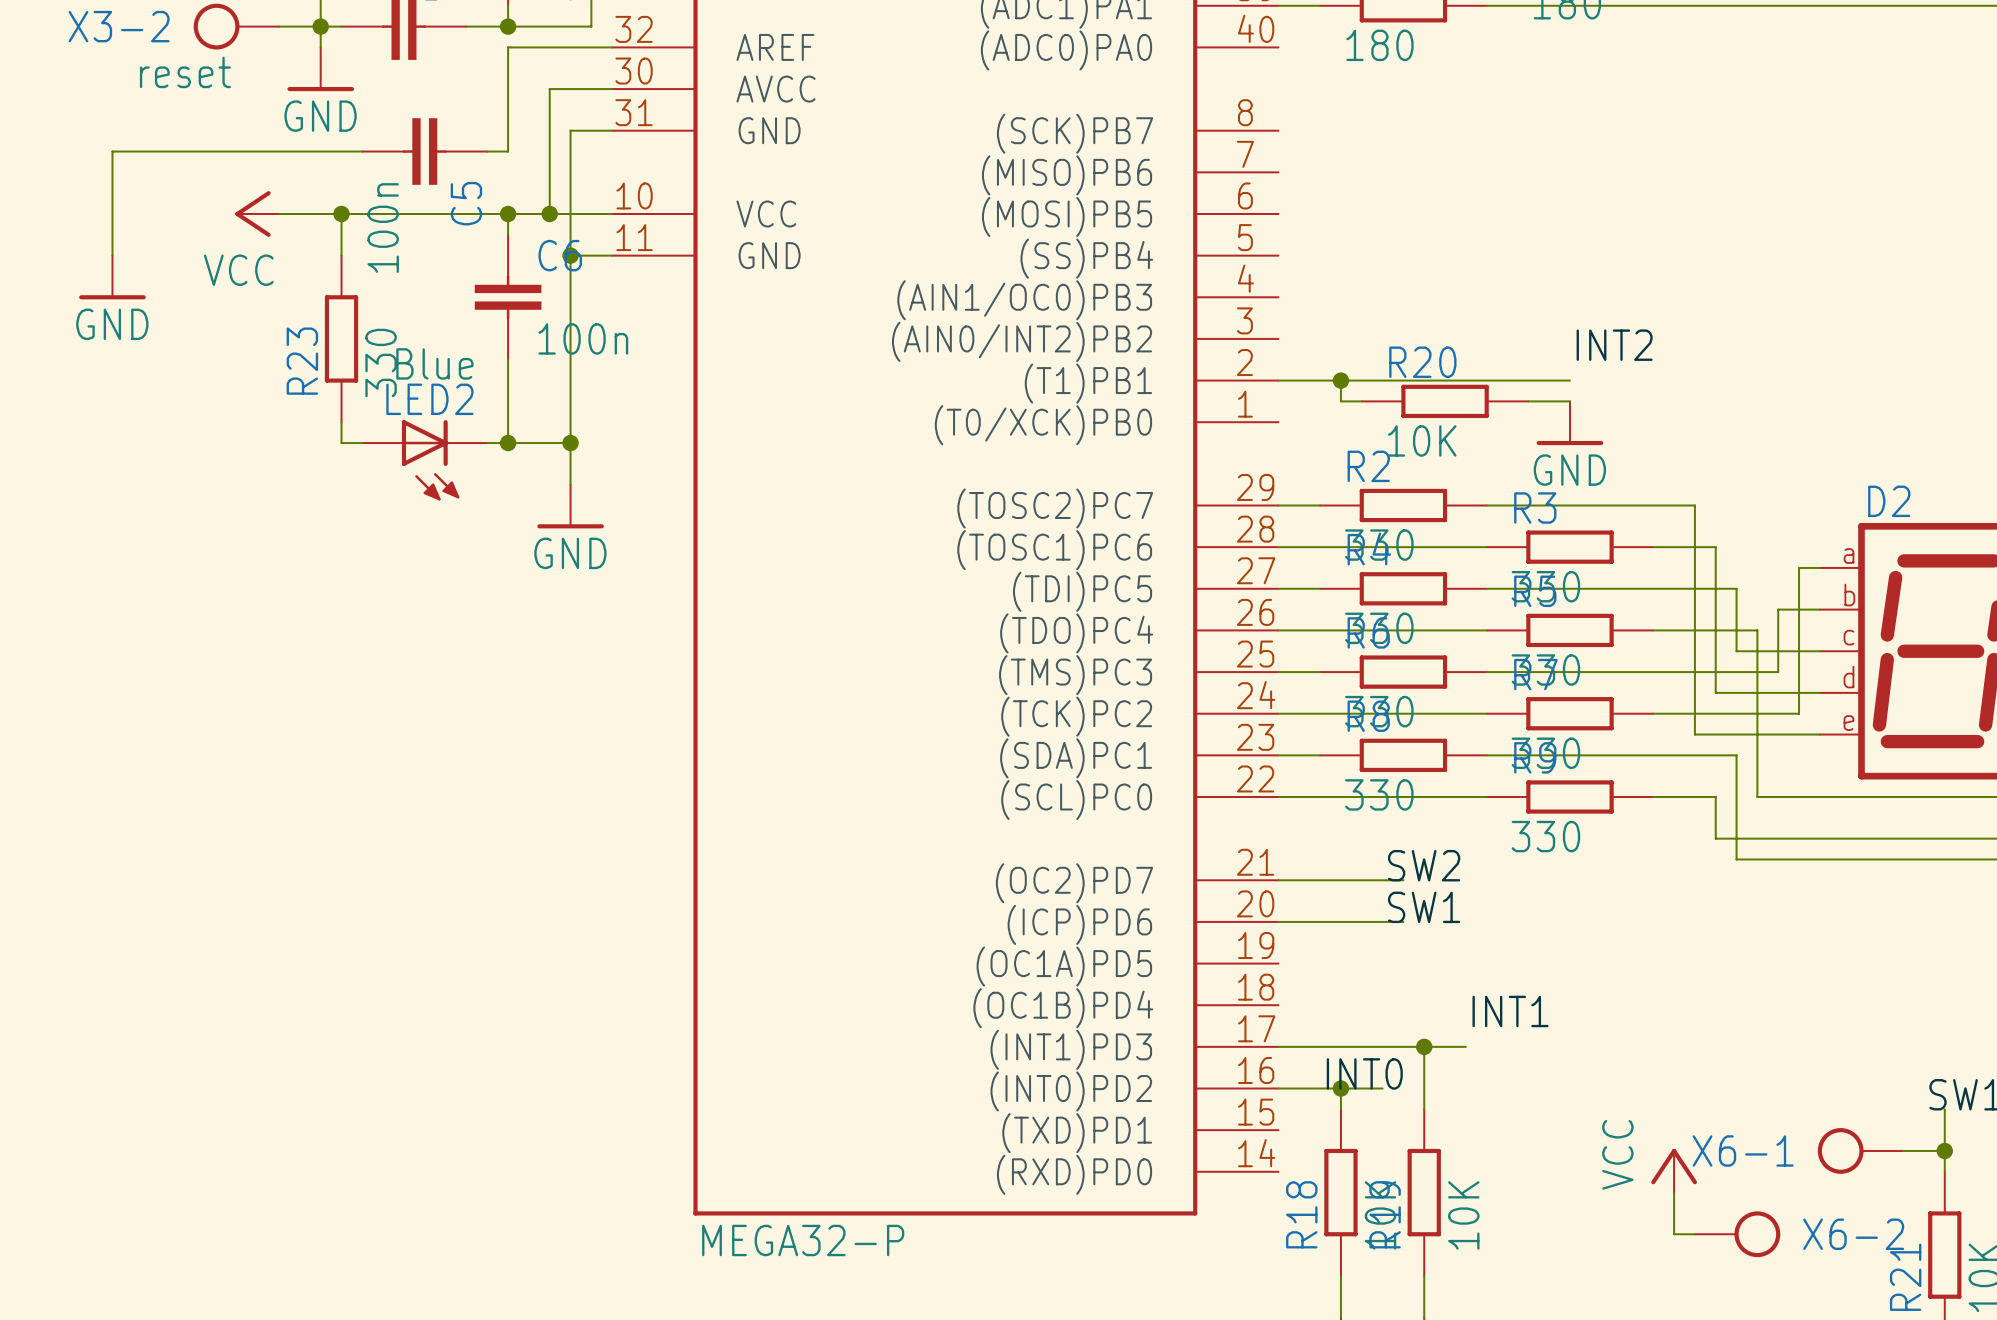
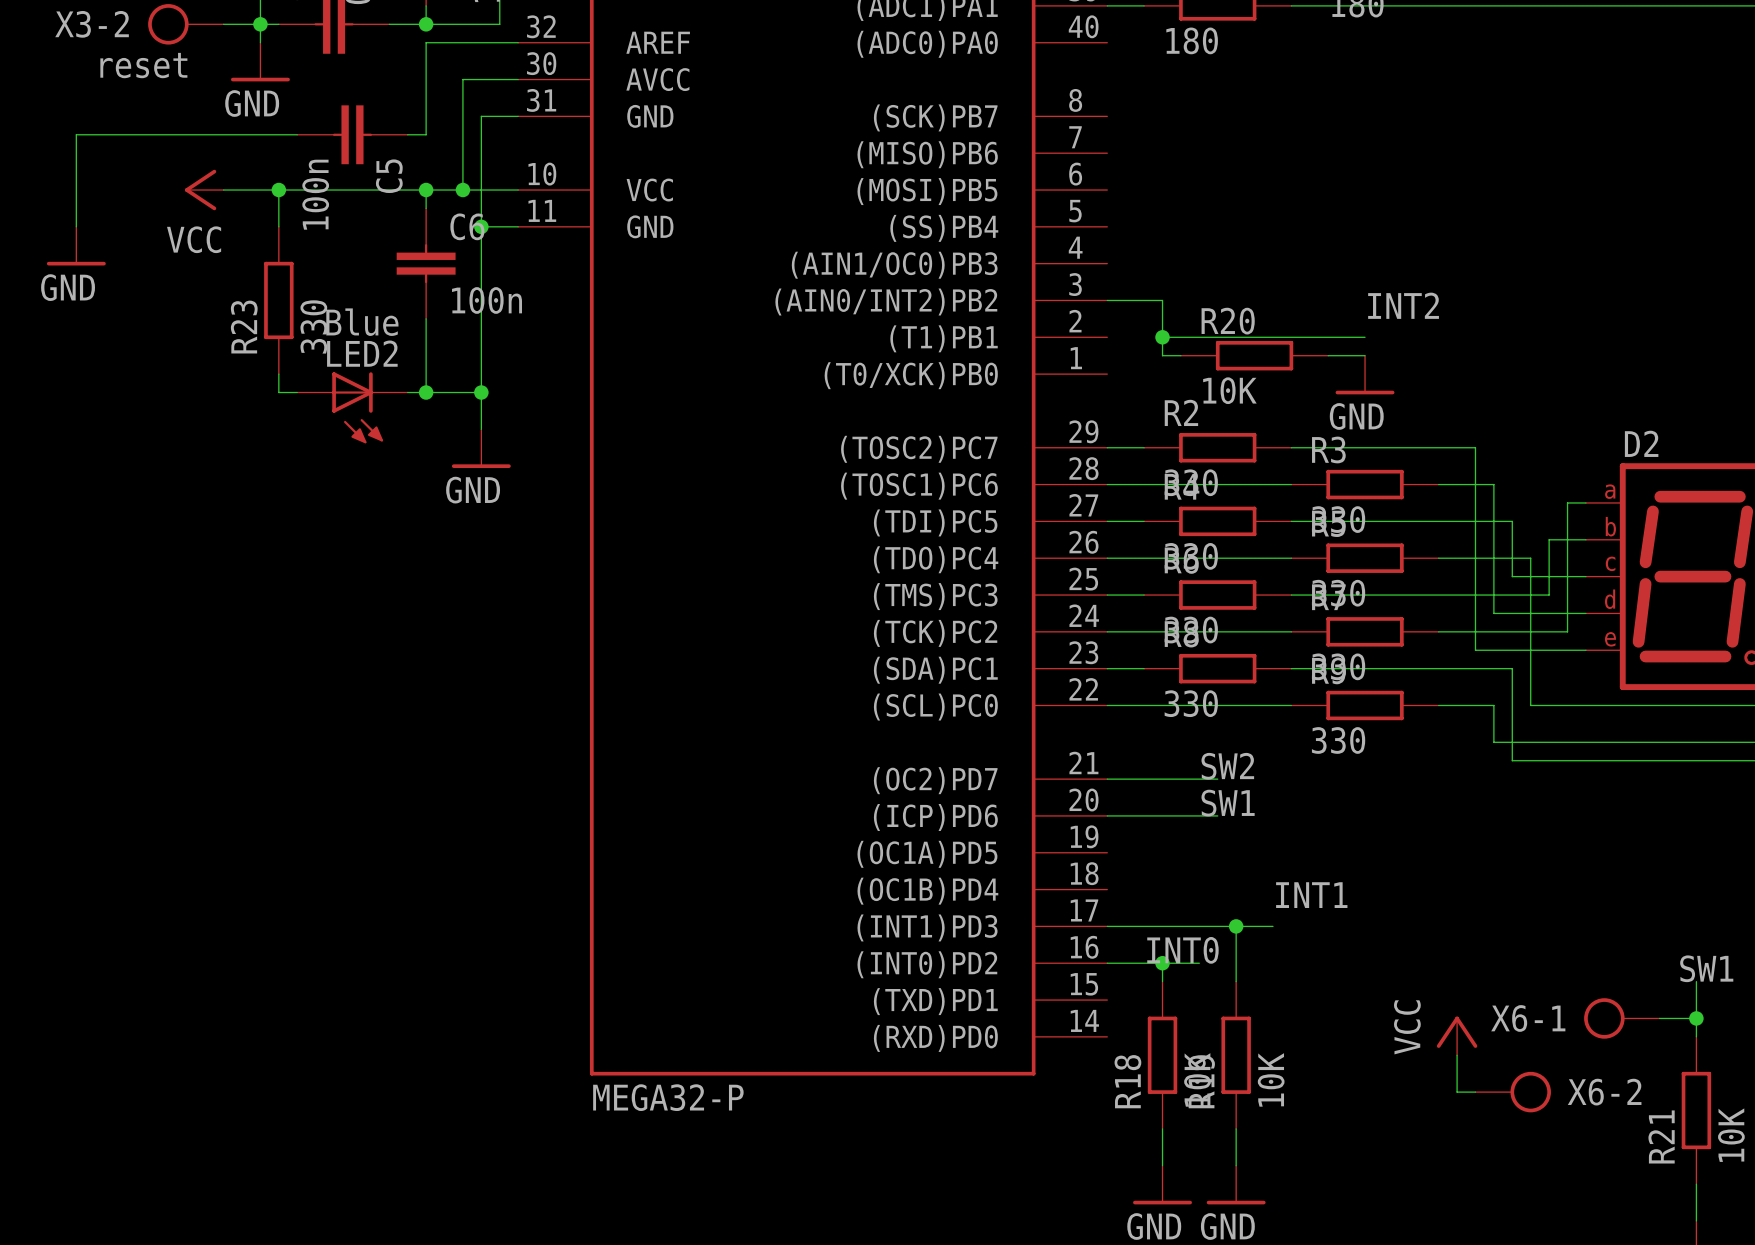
wire: (1278, 380) (1340, 380) -> (1107, 300) (1162, 300) (1162, 337)

